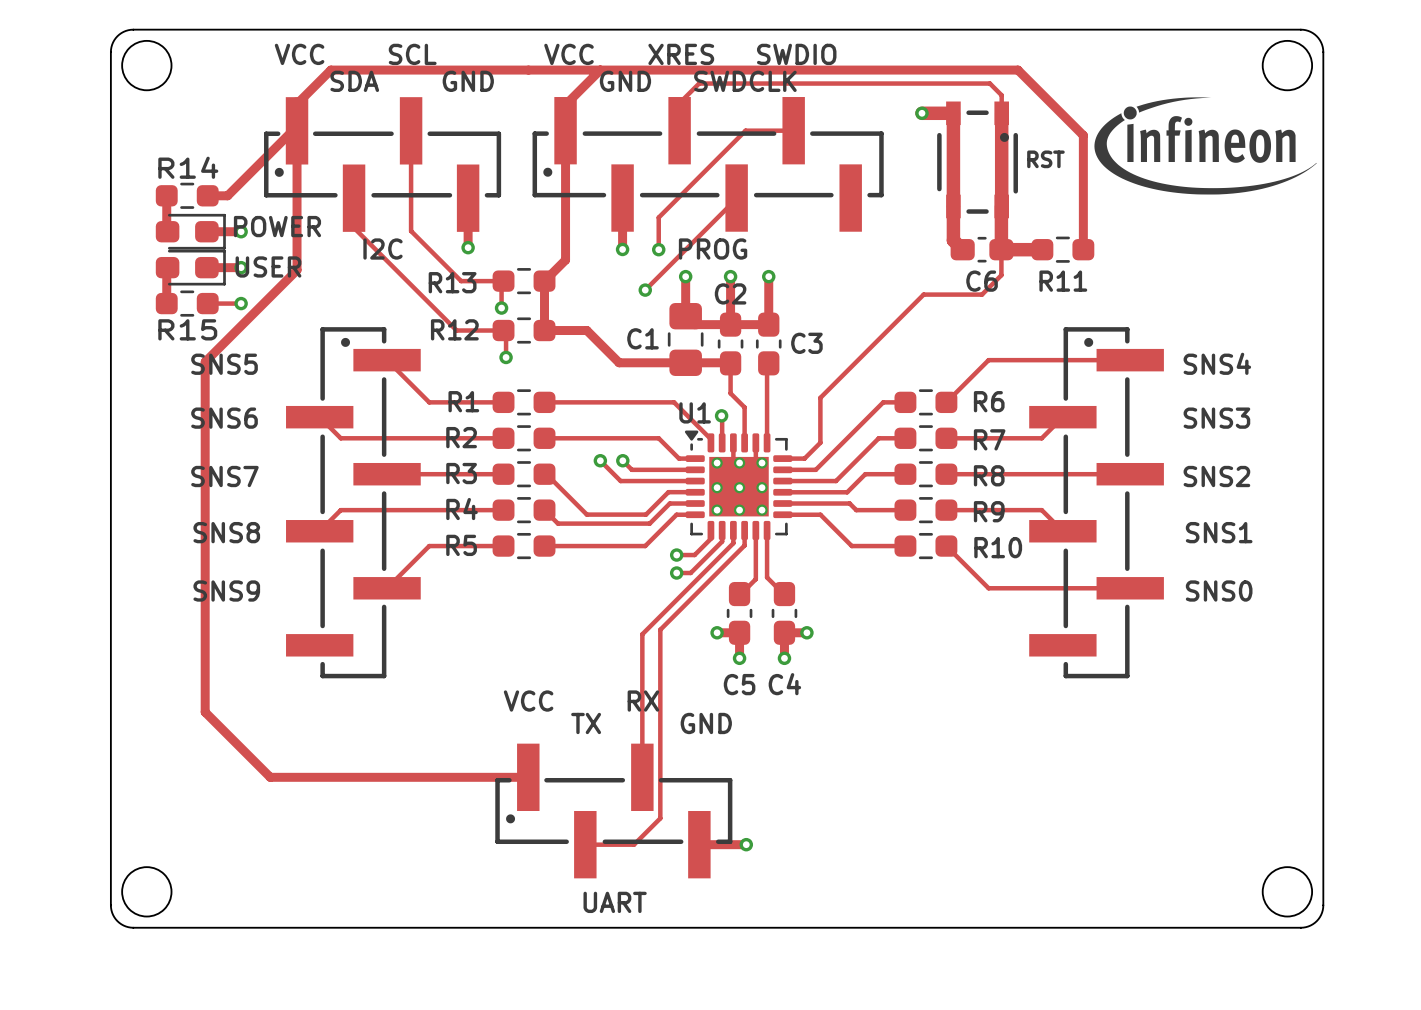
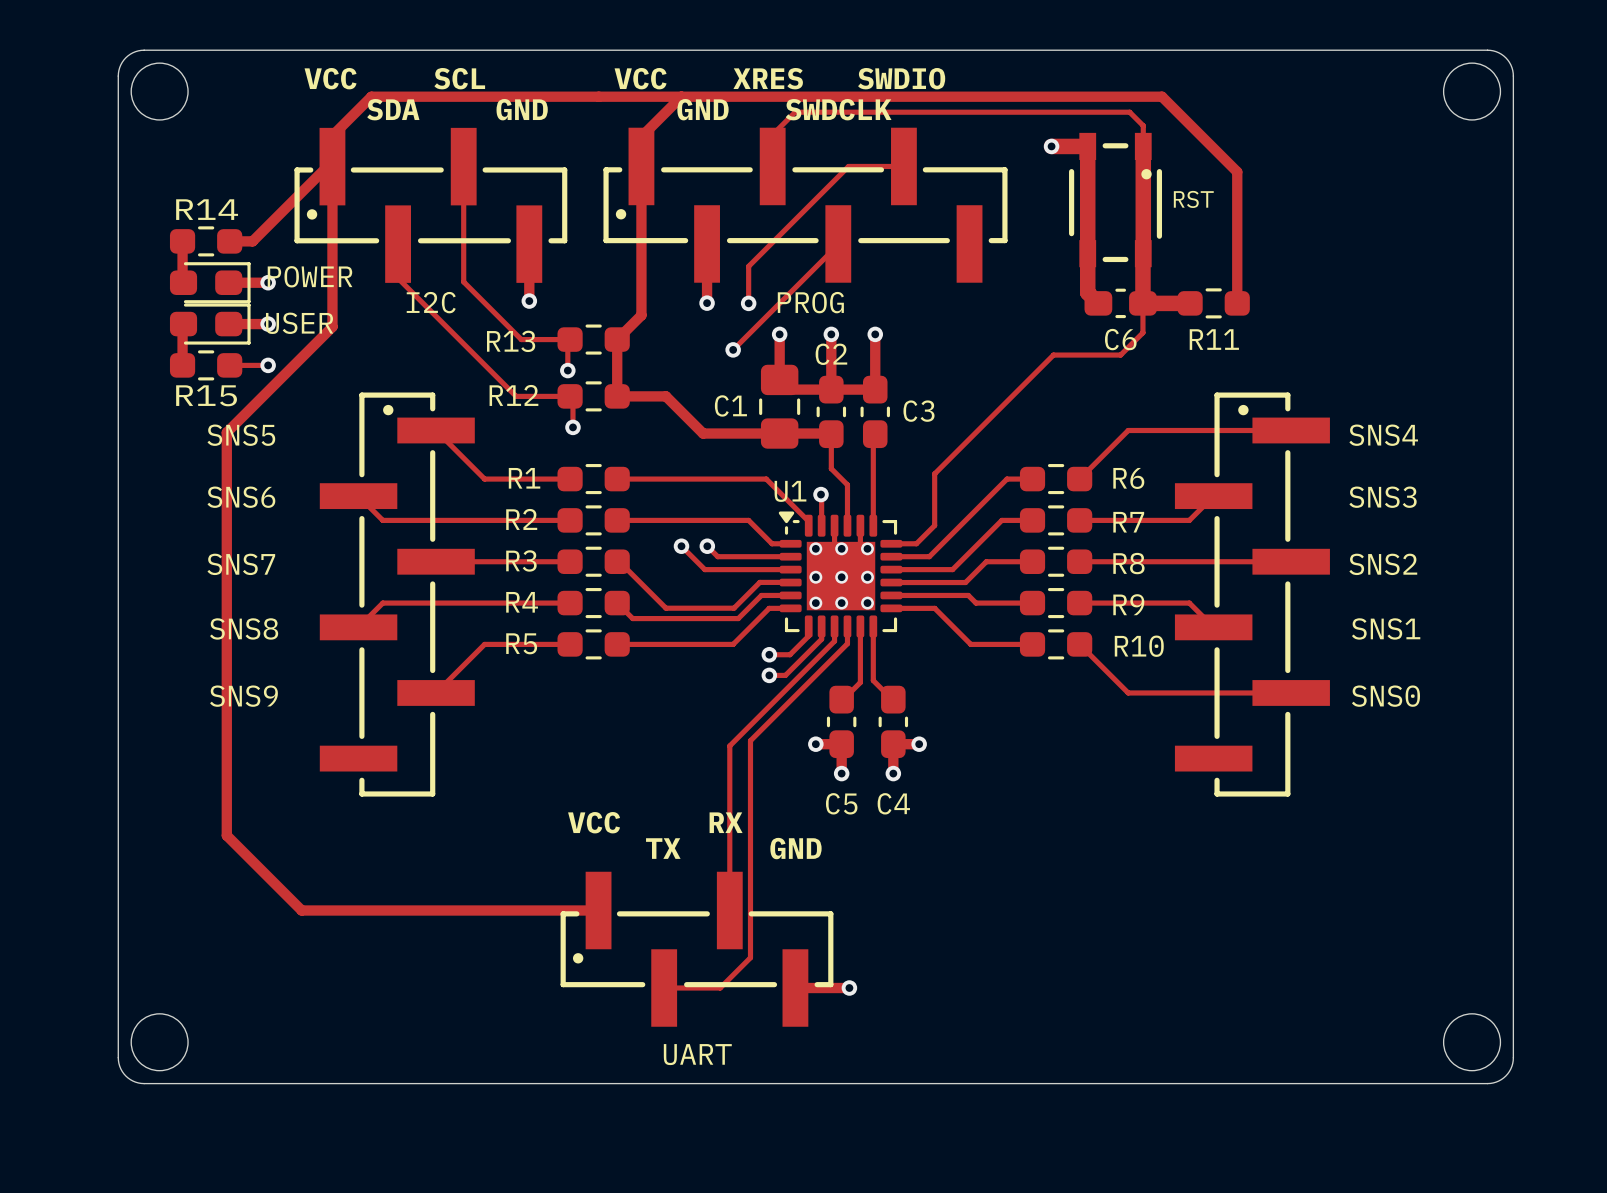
drawing: [1094, 97, 1317, 195] -> none

